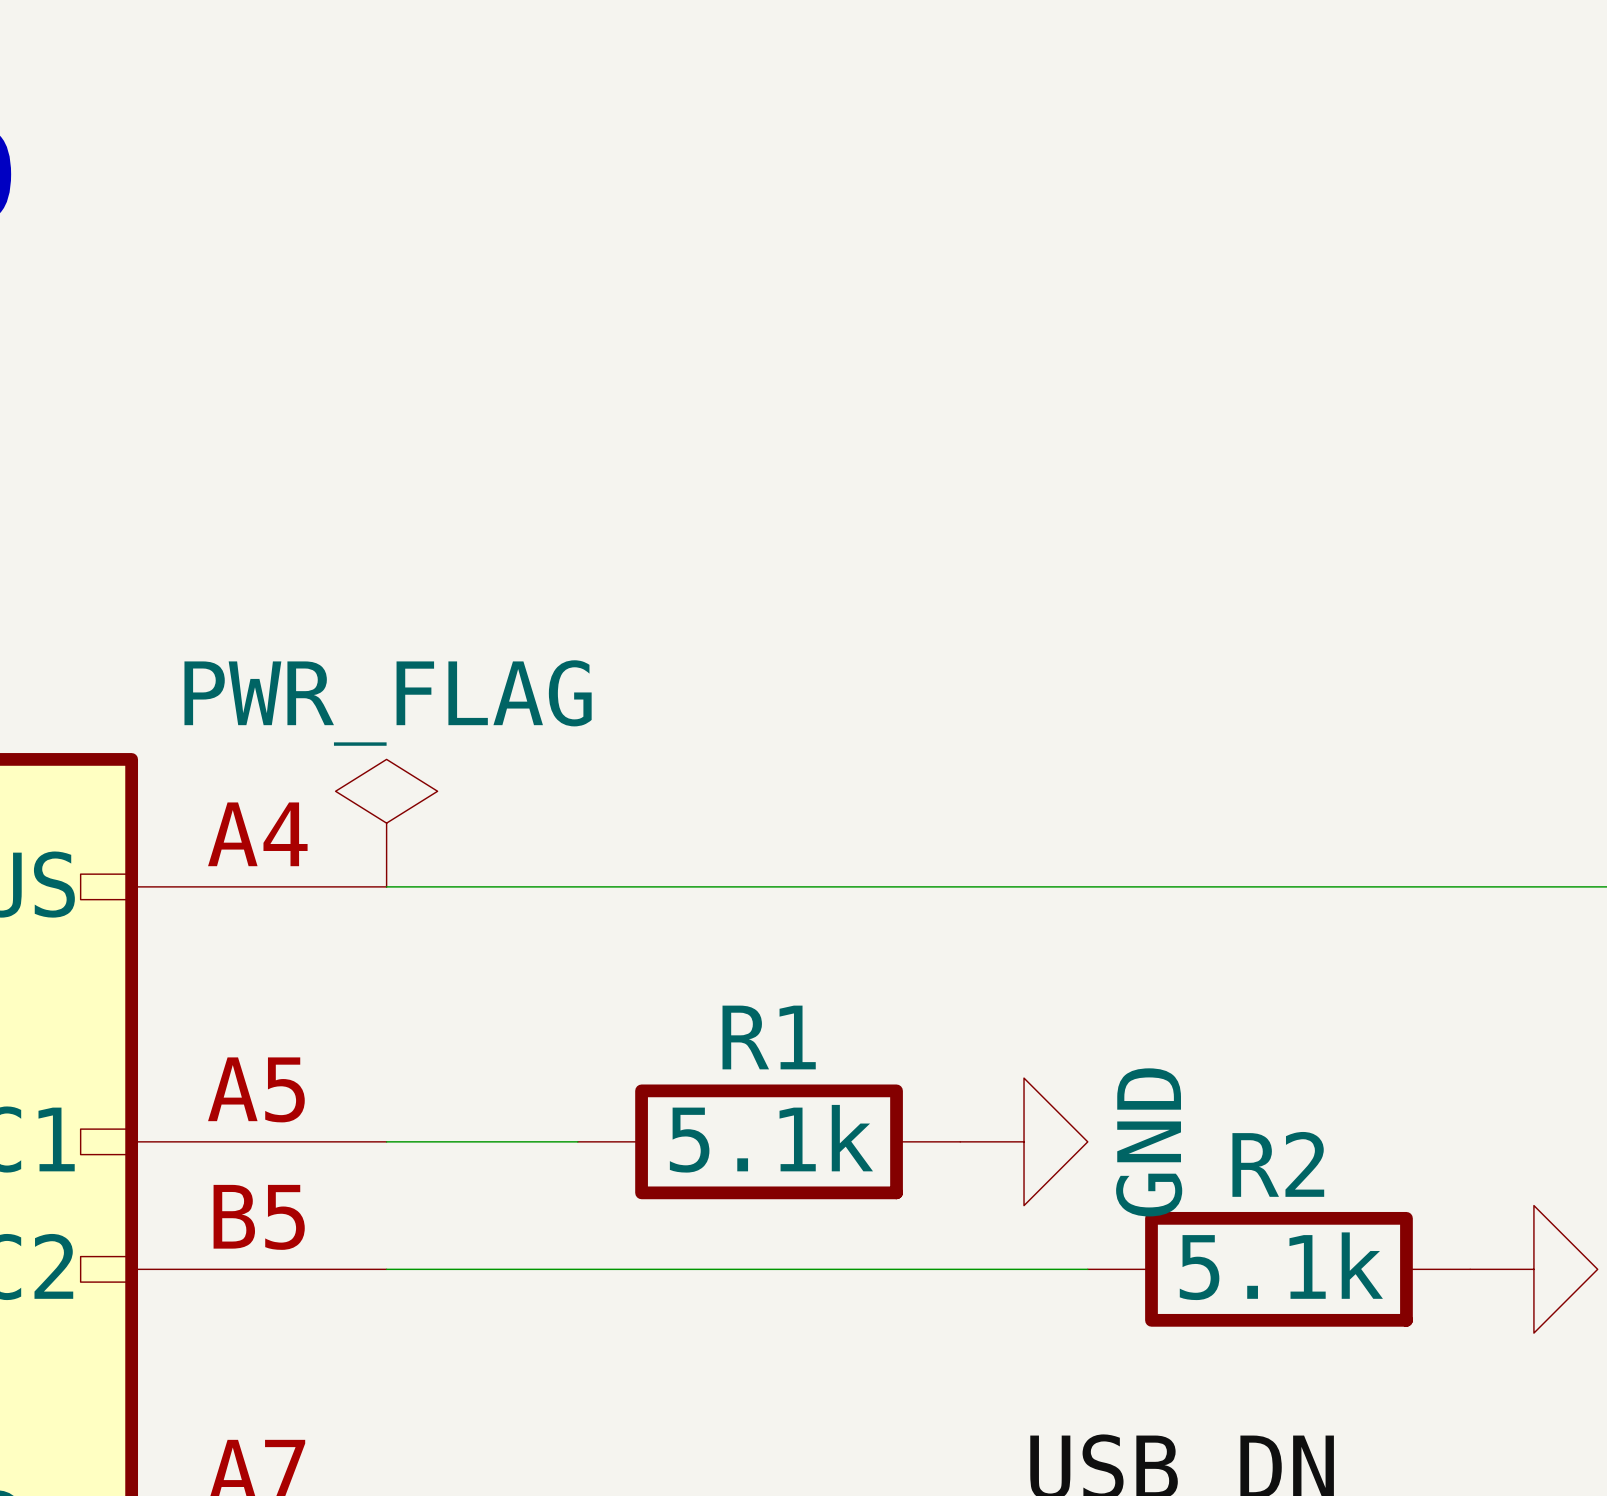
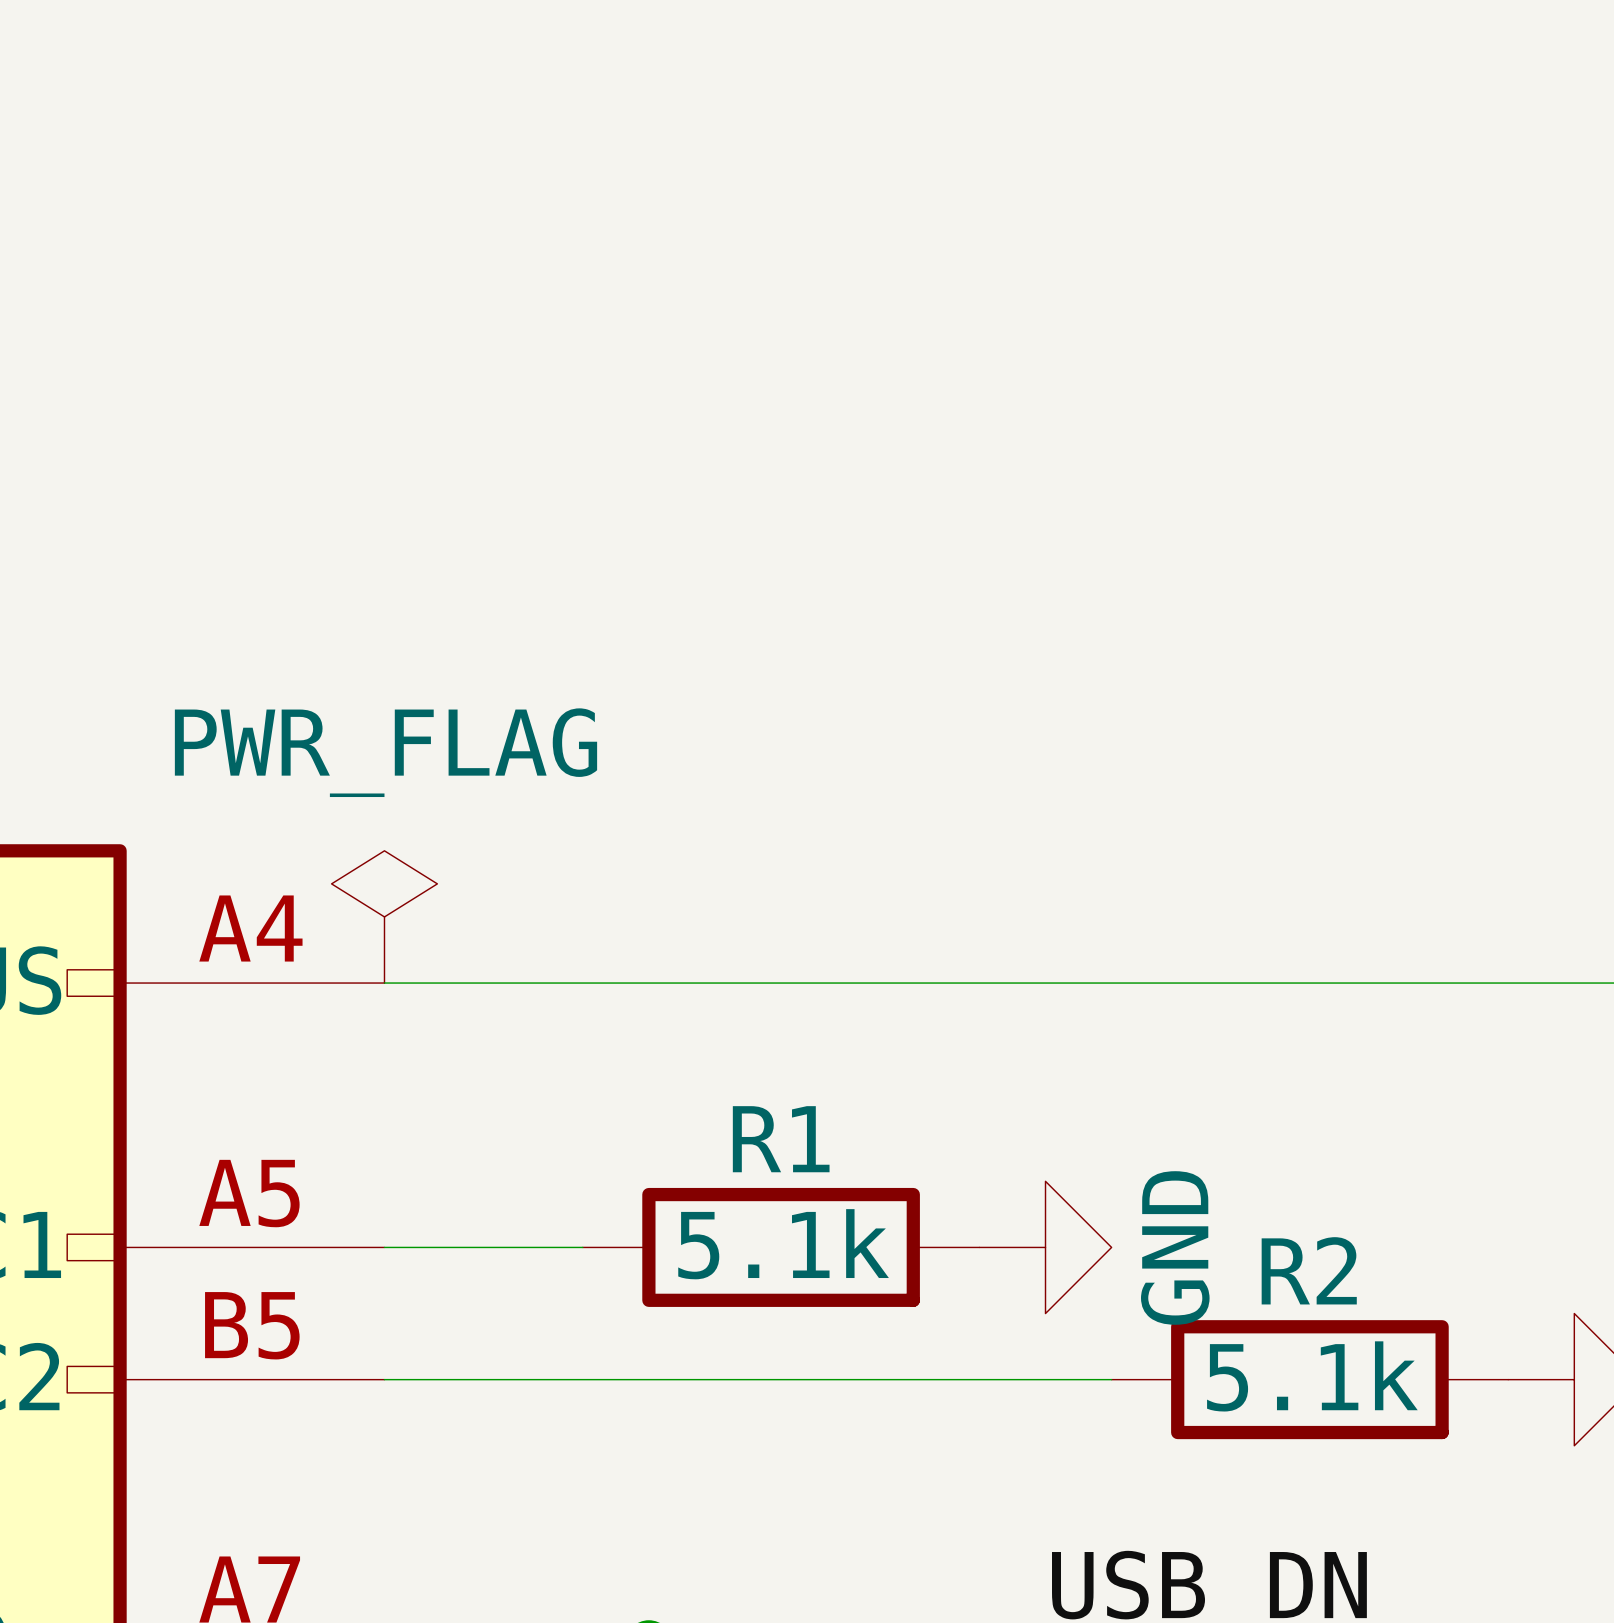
power symbol text position: PWR_FLAG (388, 703) -> PWR_FLAG (385, 752)

